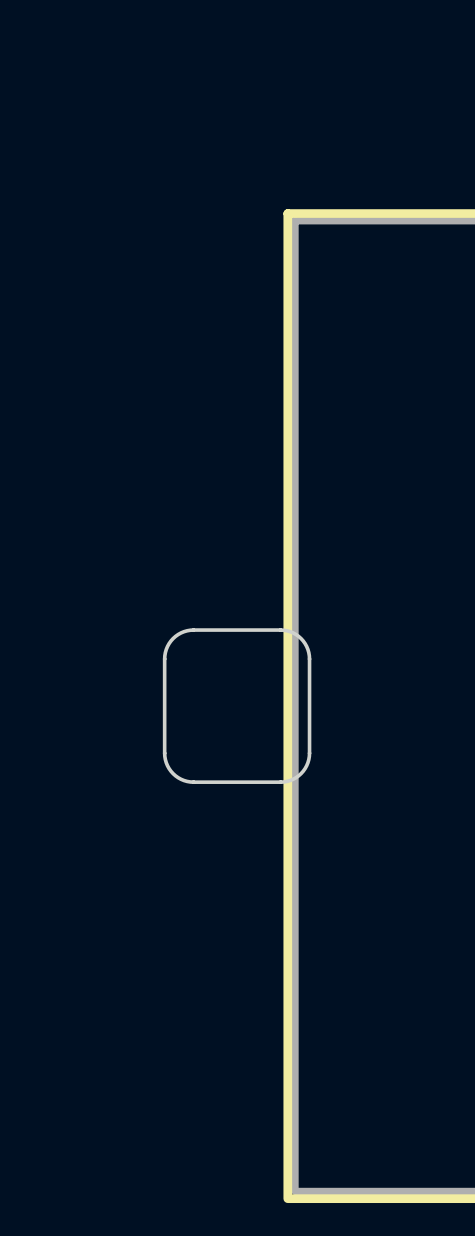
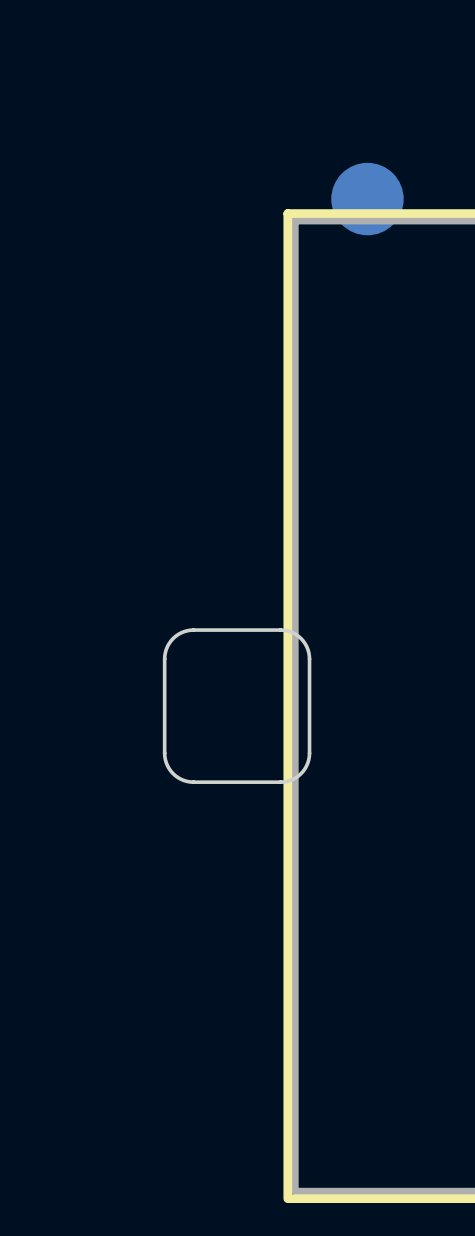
part: none -> (367, 199)

